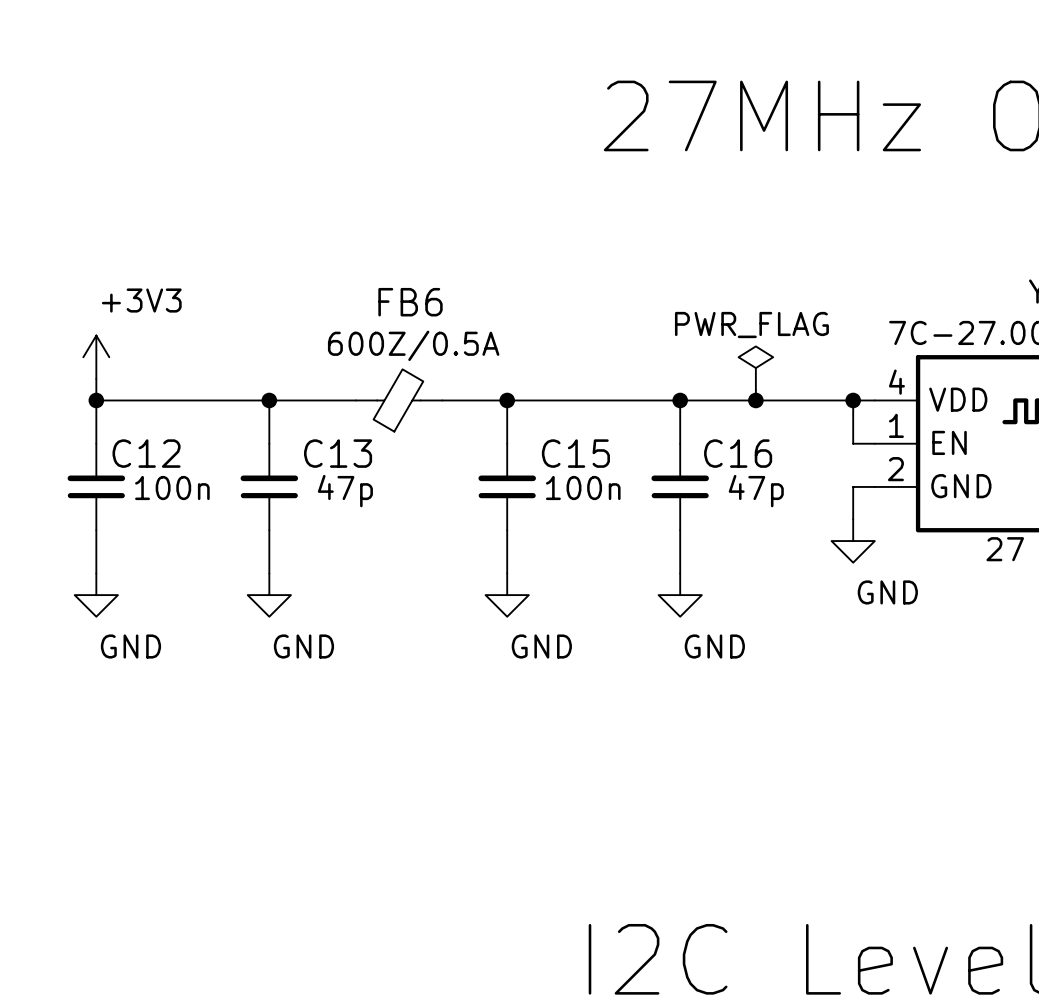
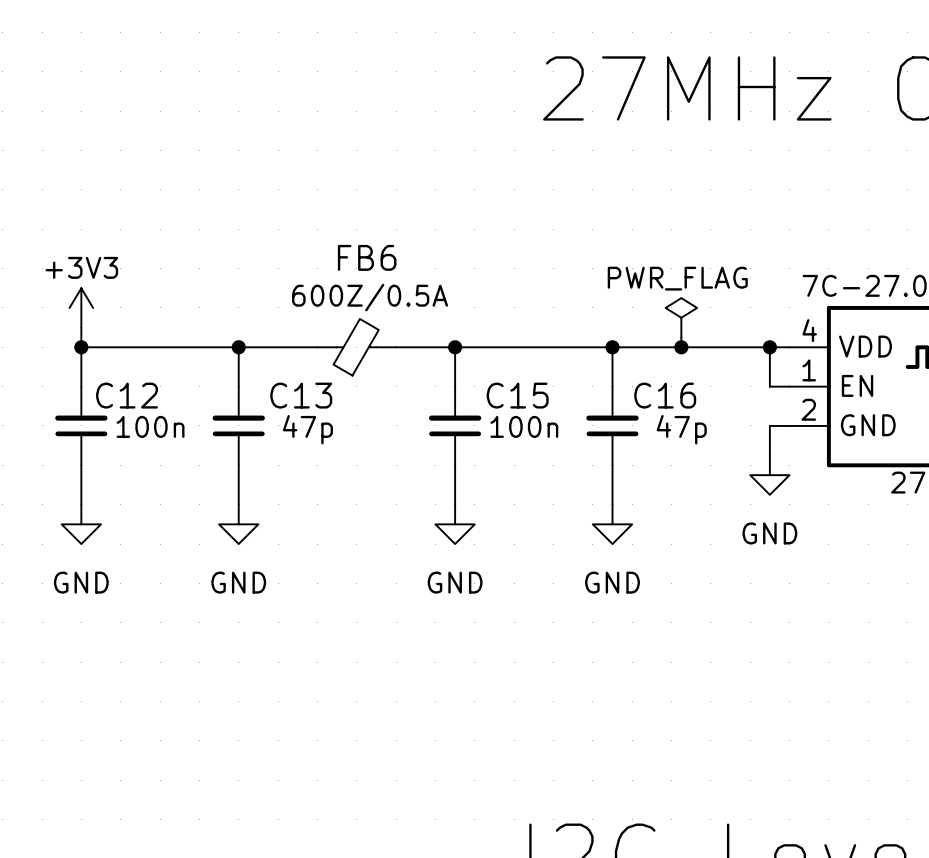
power symbol text position: +3V3 (141, 300) -> +3V3 (81, 267)
power symbol text position: GND (887, 592) -> GND (769, 533)
power symbol text position: GND (130, 646) -> GND (81, 582)
power symbol text position: GND (303, 646) -> GND (238, 582)
power symbol text position: GND (541, 646) -> GND (455, 582)
power symbol text position: GND (714, 646) -> GND (612, 582)

